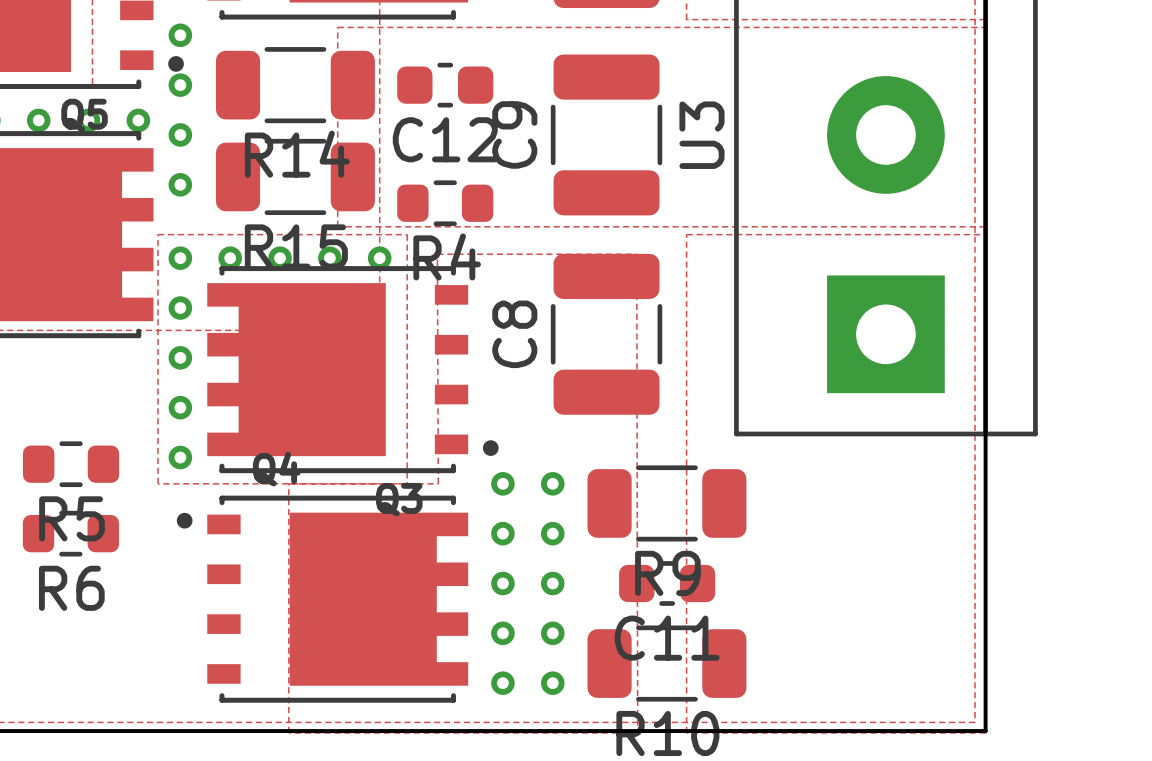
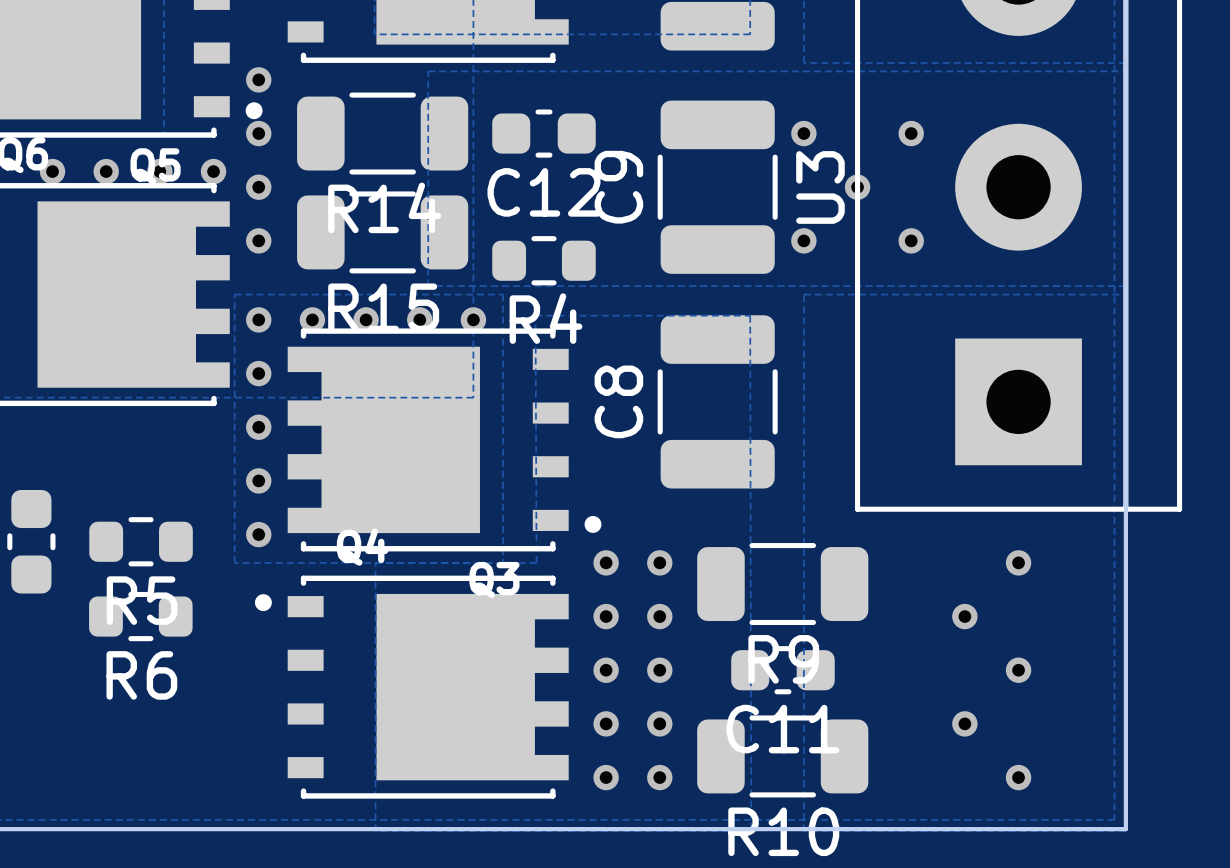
via: none -> (803, 133)
via: none -> (911, 133)
via: none -> (857, 187)
via: none -> (803, 240)
via: none -> (911, 240)
via: none -> (1018, 562)
via: none -> (964, 616)
via: none -> (1018, 670)
via: none -> (964, 723)
via: none -> (1018, 777)

